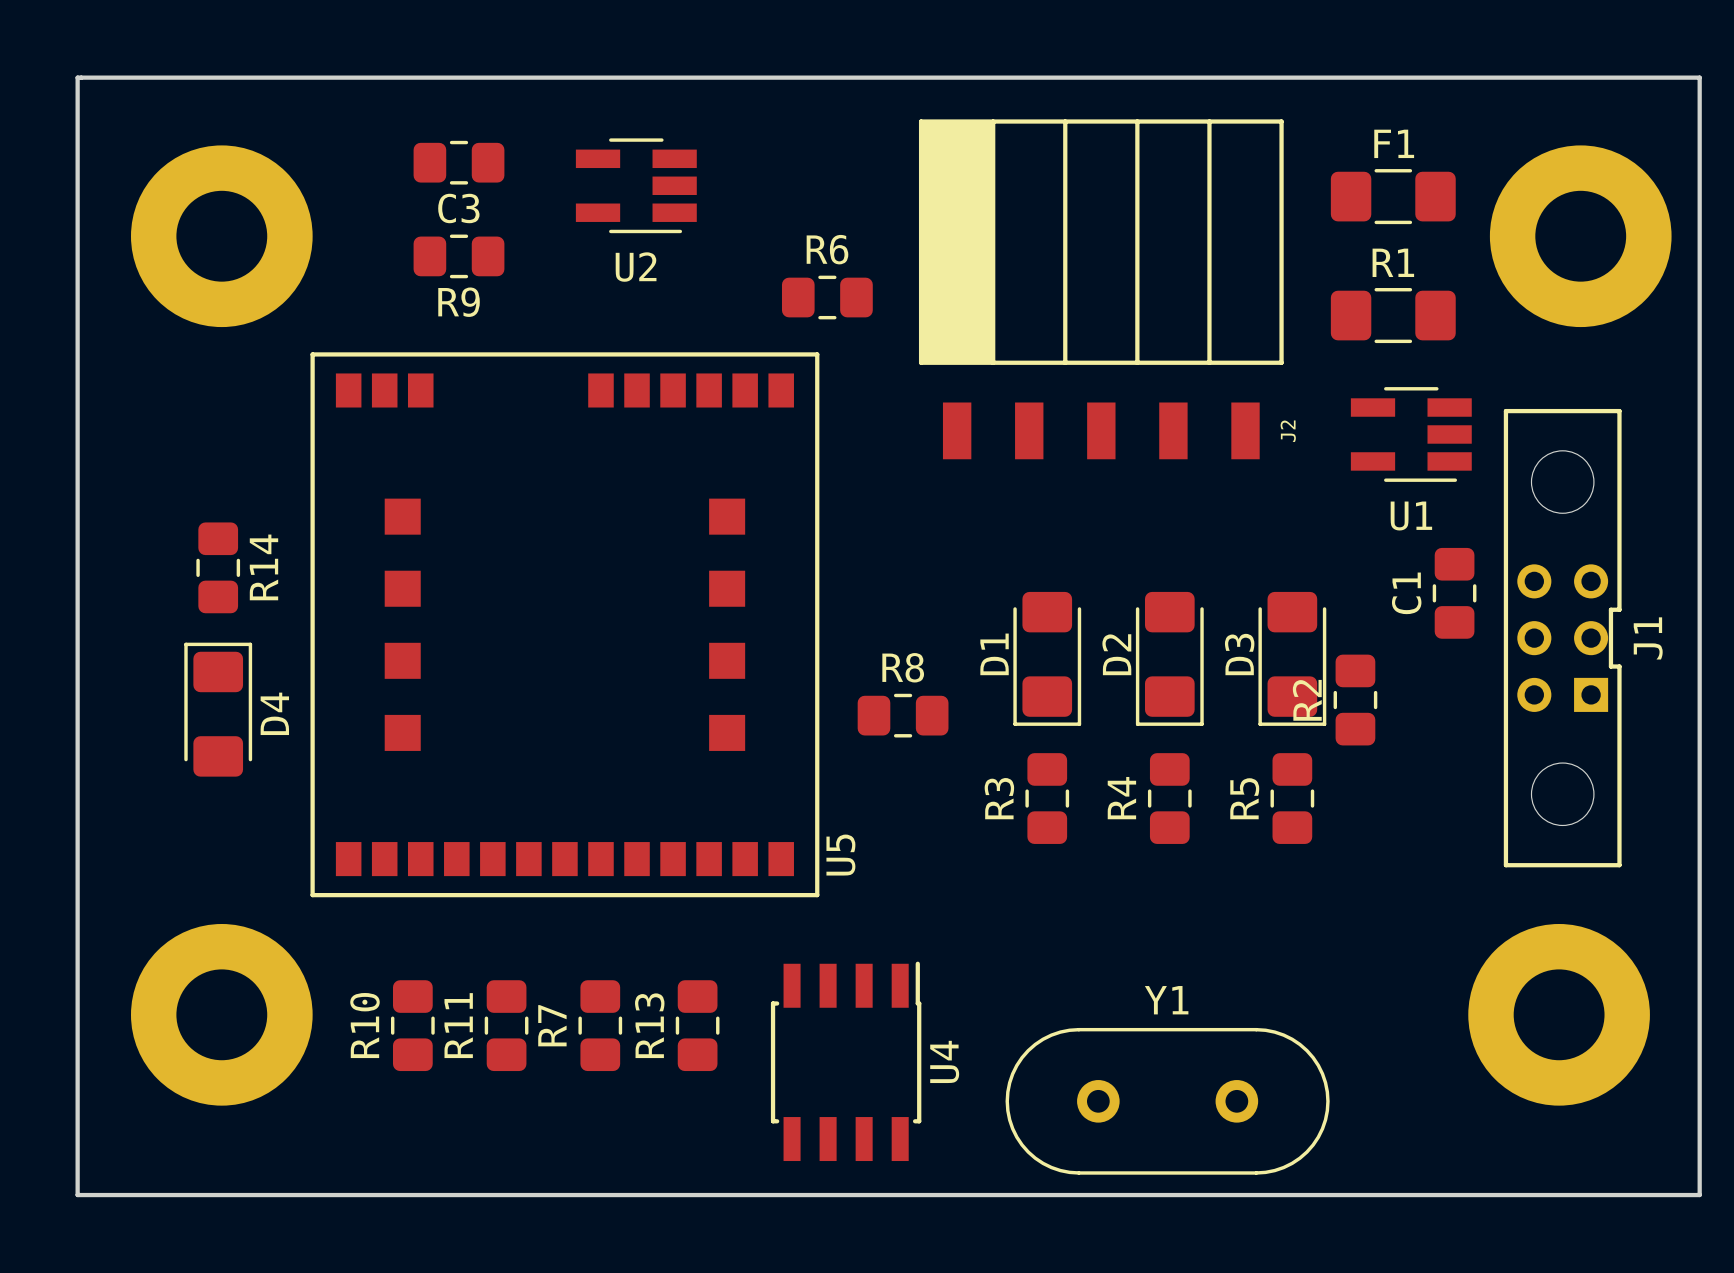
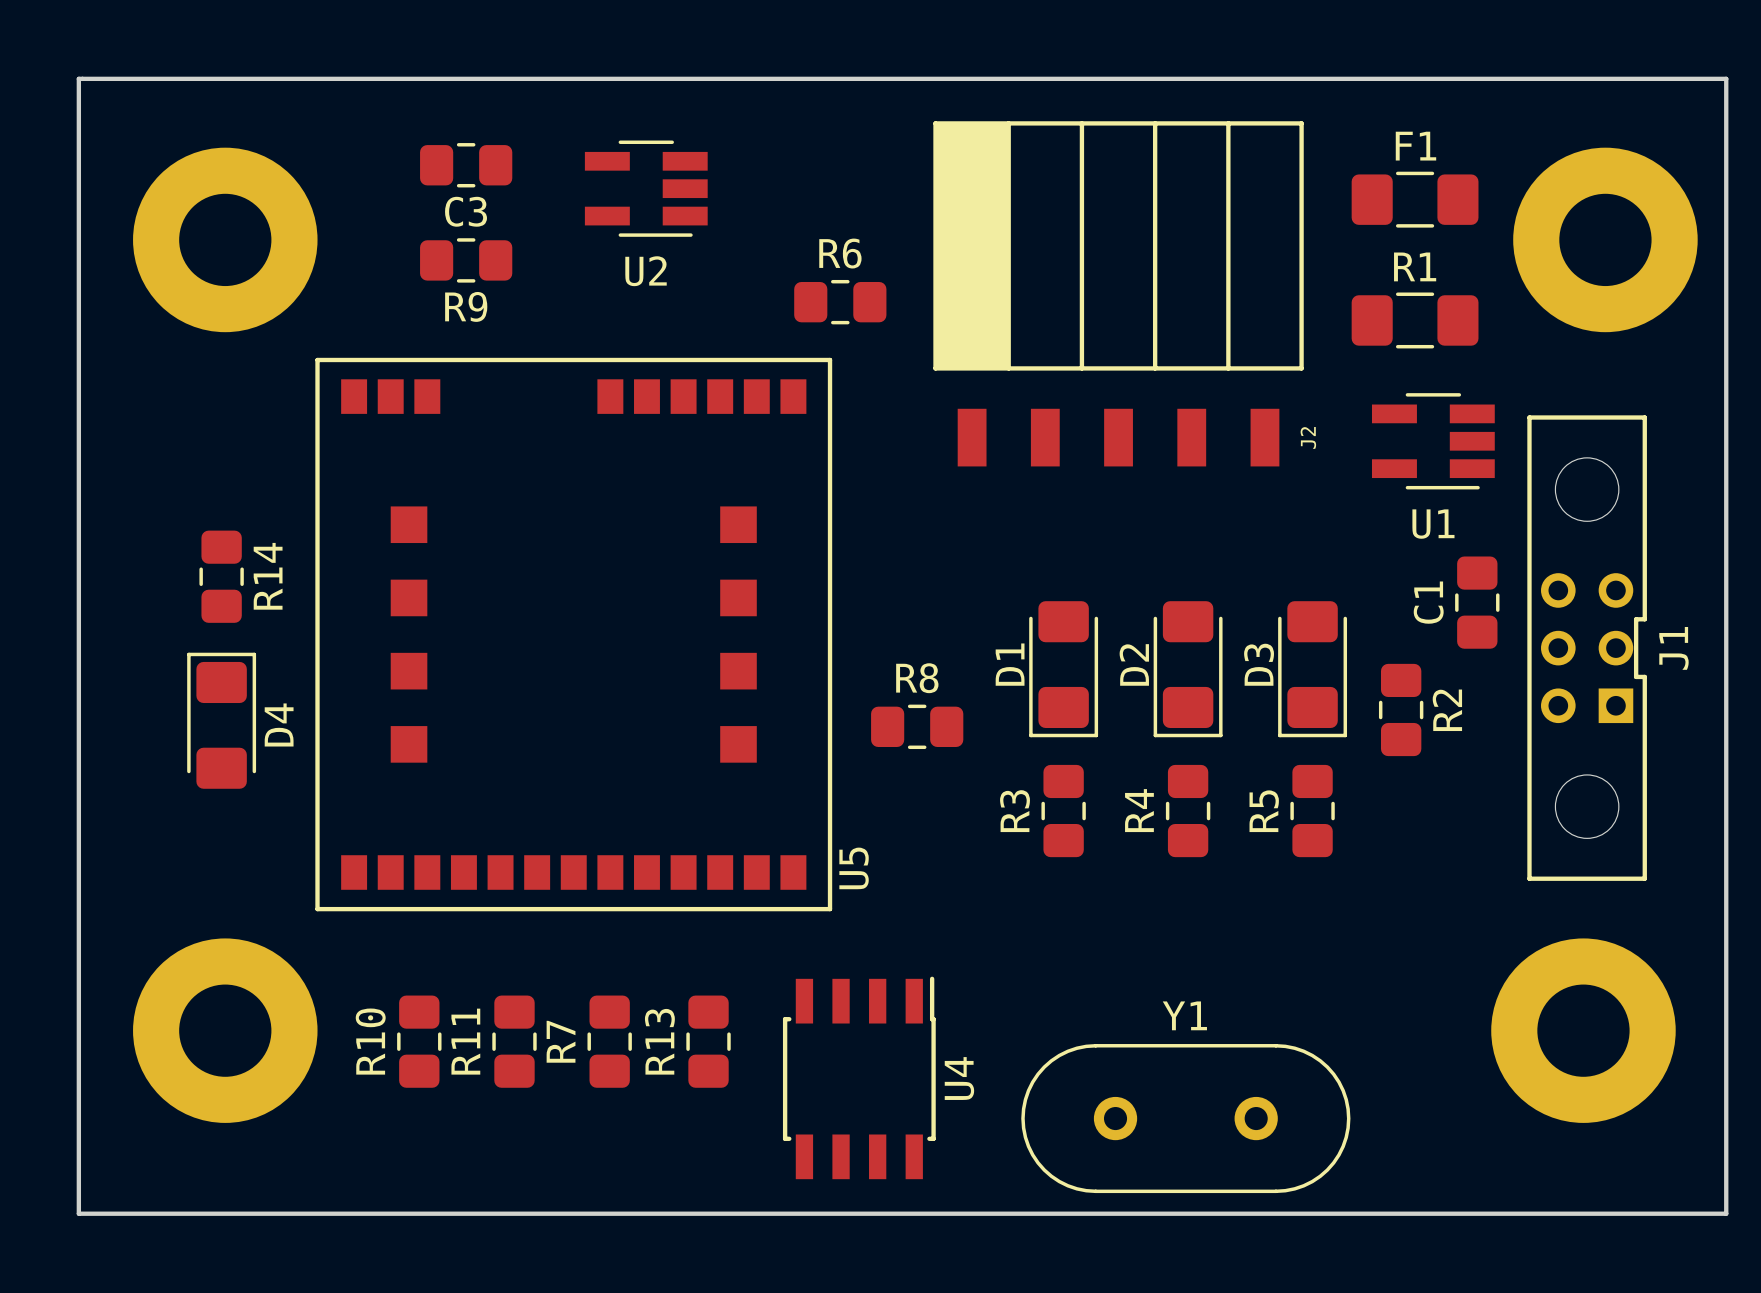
R2 name position: R2 (1307, 700) -> R2 (1447, 710)
R2 position: (1355, 700) -> (1401, 709)

